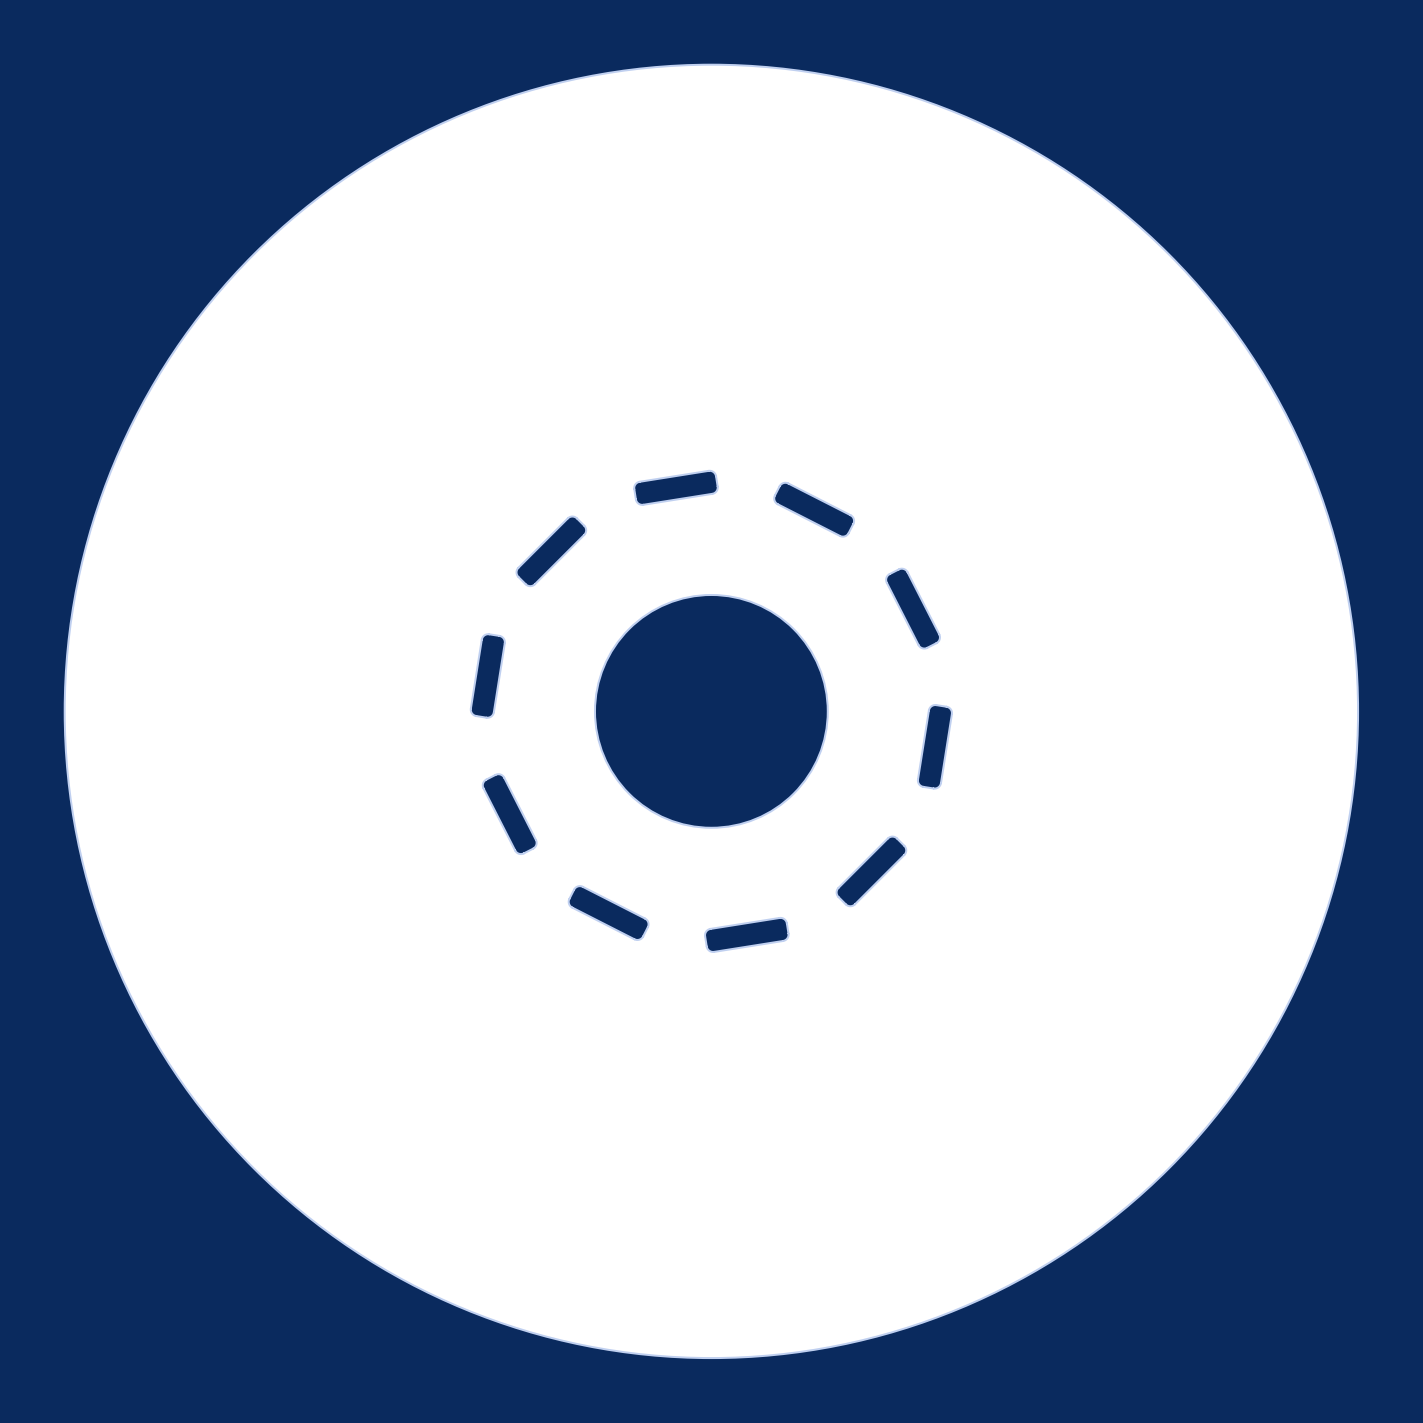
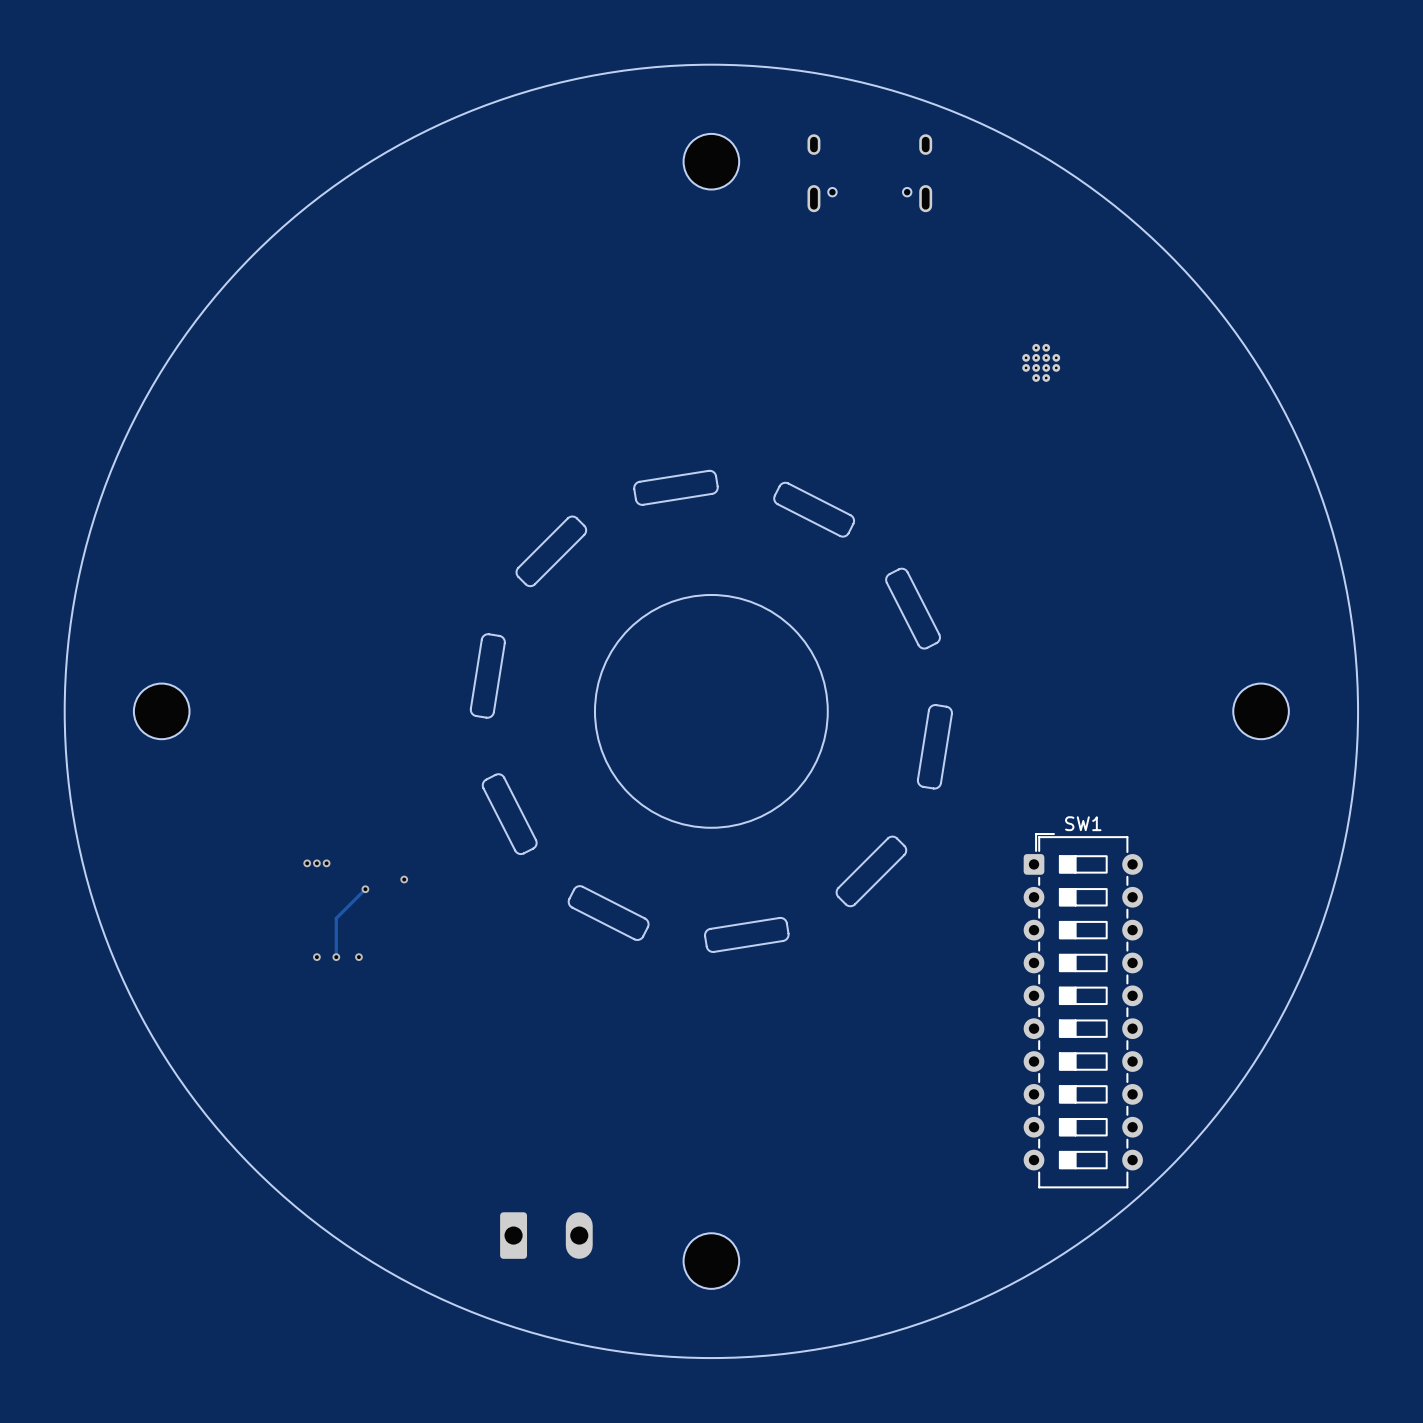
drawing: [64, 64, 1359, 1359] -> none

